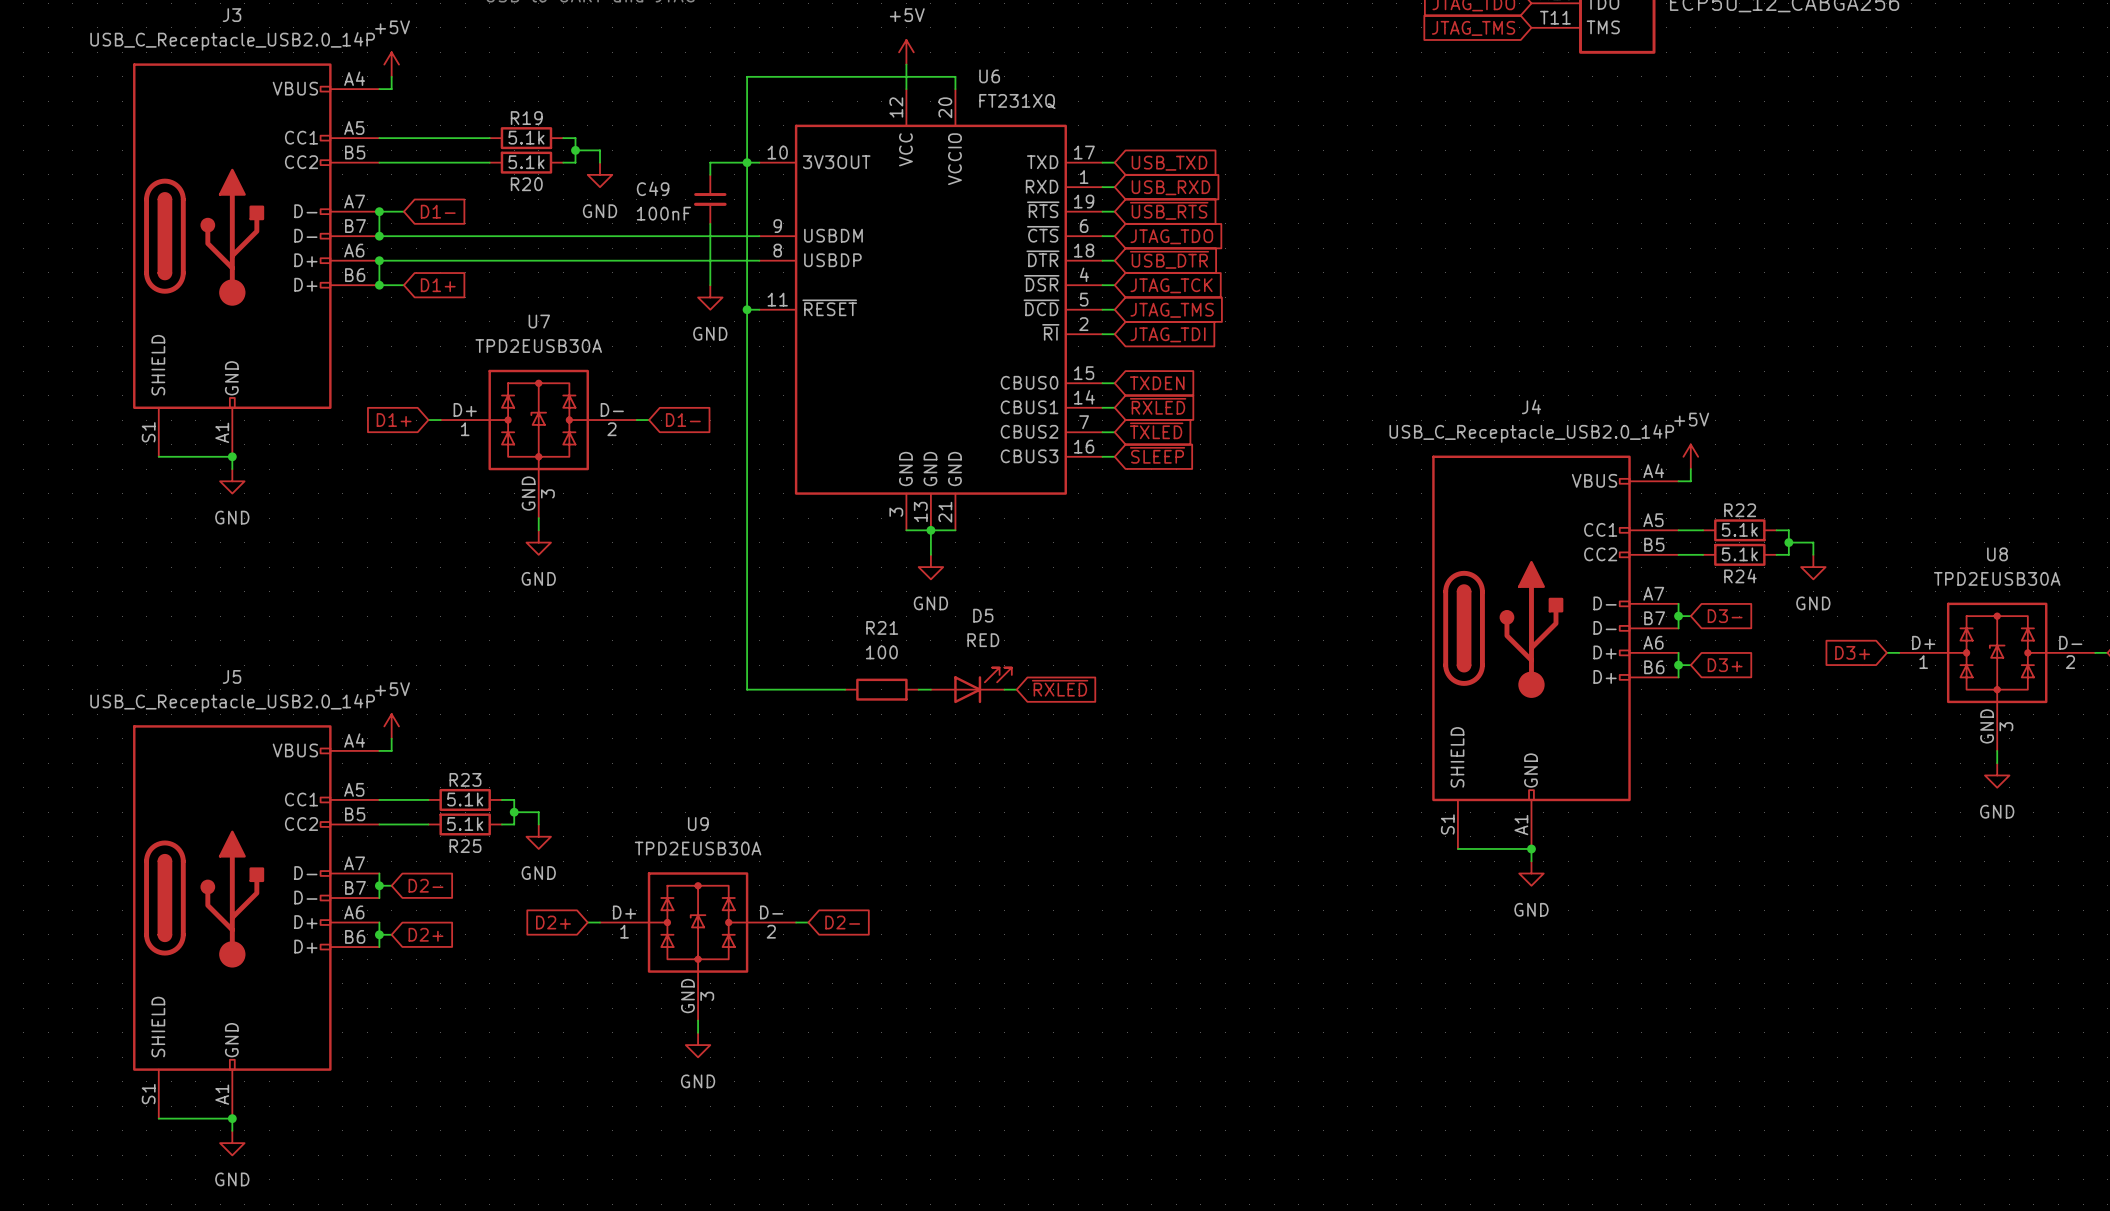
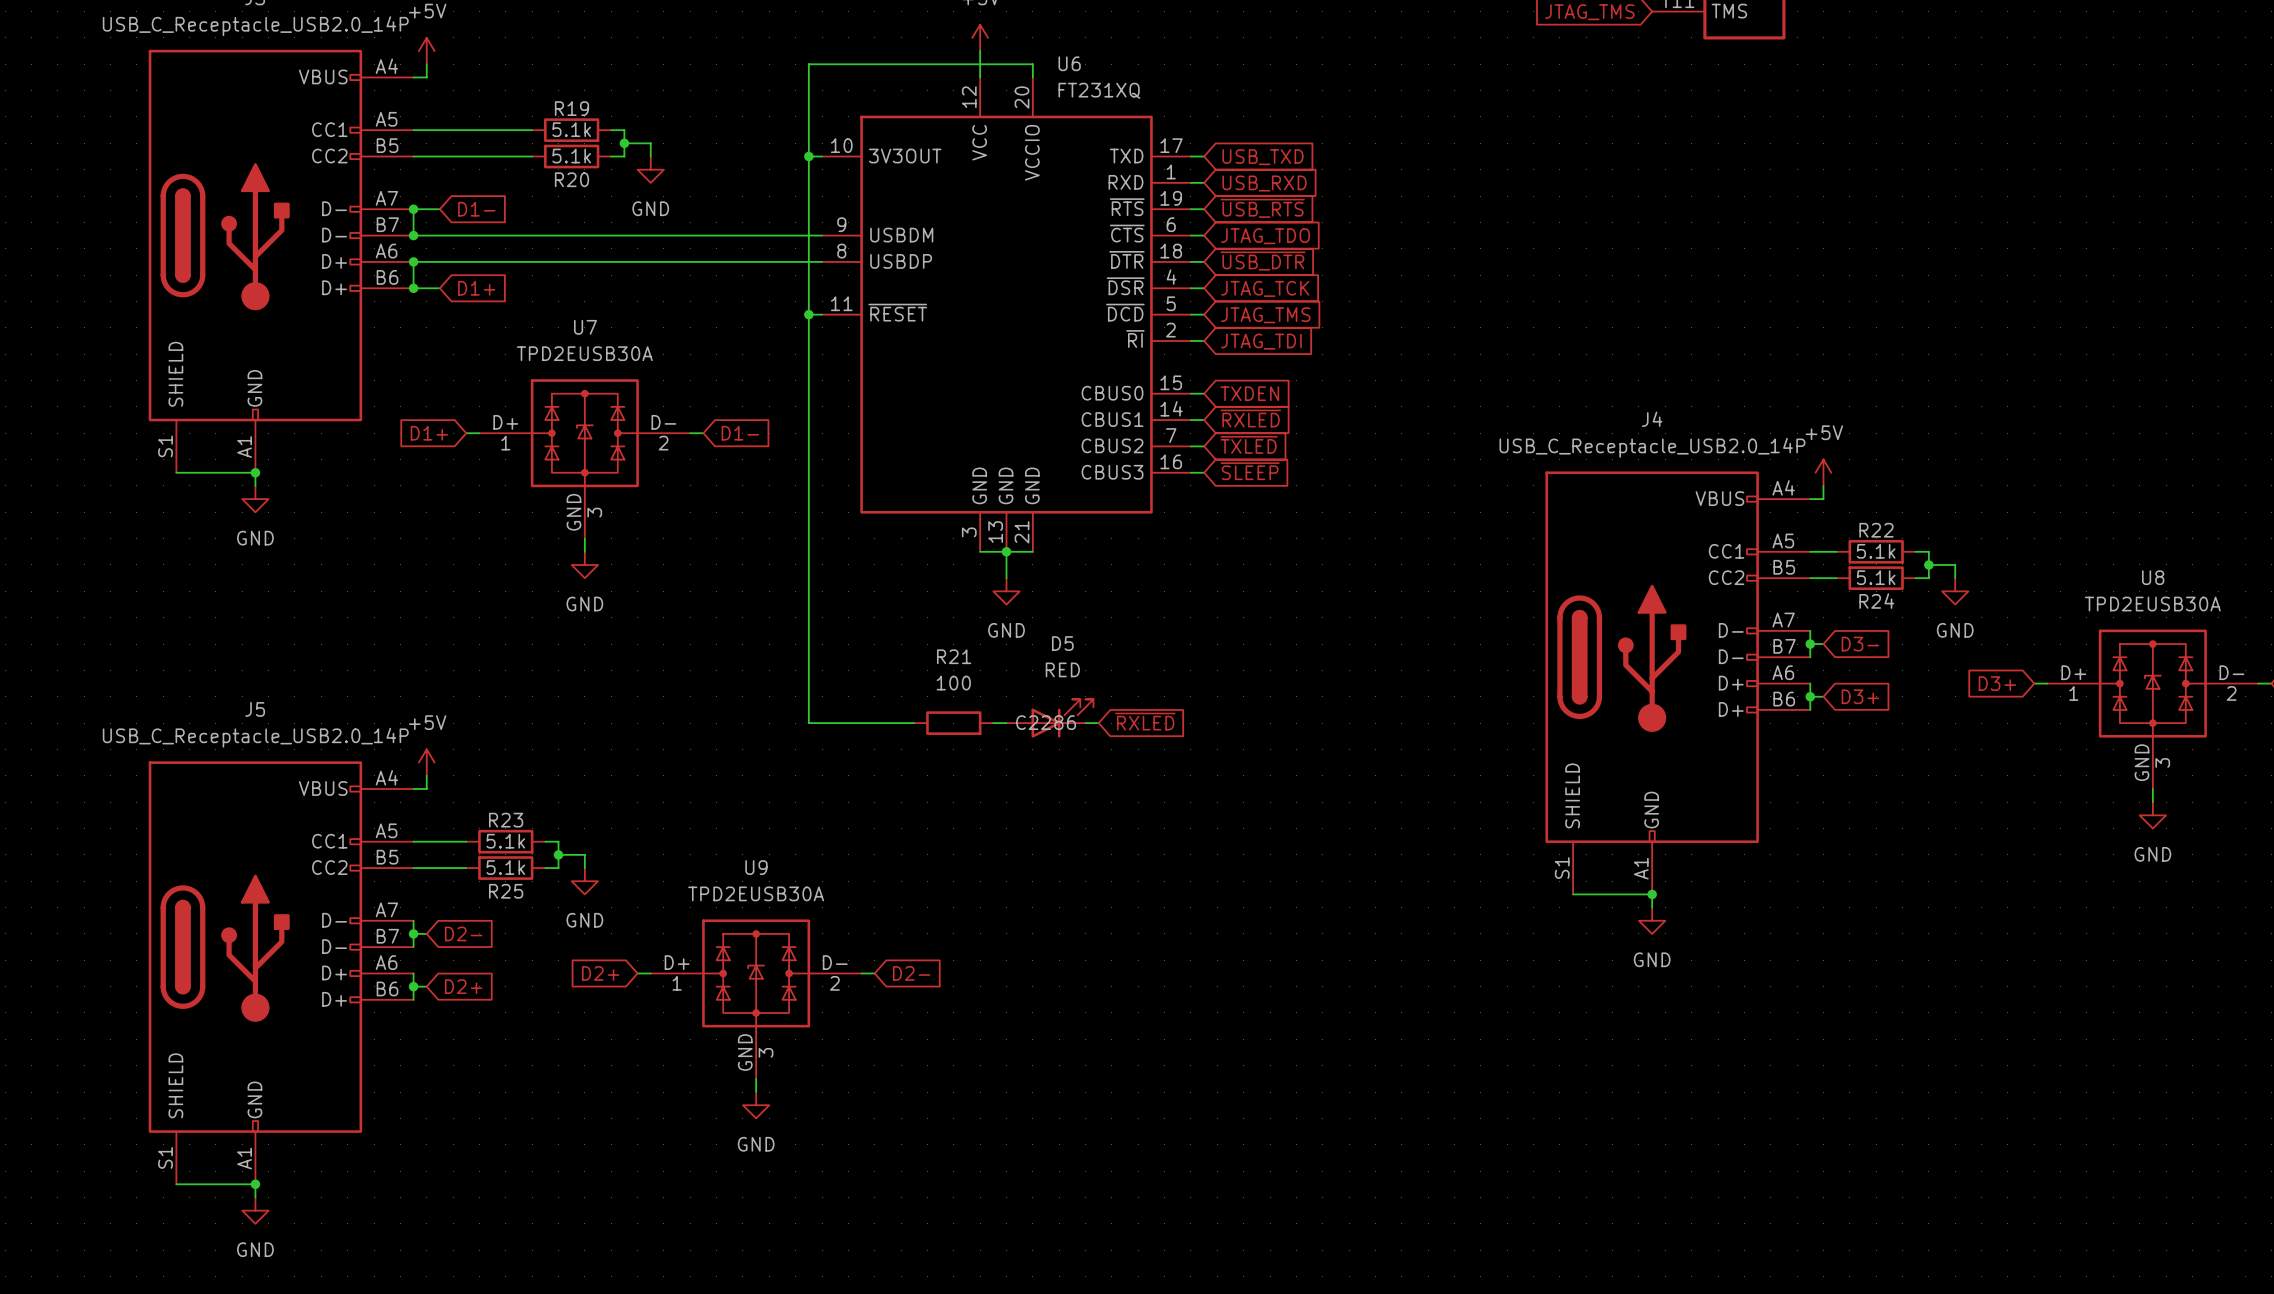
wire: (747, 162) (710, 162) (710, 174) -> none
C49: 100nF (710, 199) -> none
wire: (710, 223) (710, 285) -> none
power symbol: GND (710, 297) -> none
D5 text: none -> C2286 (1046, 722)

